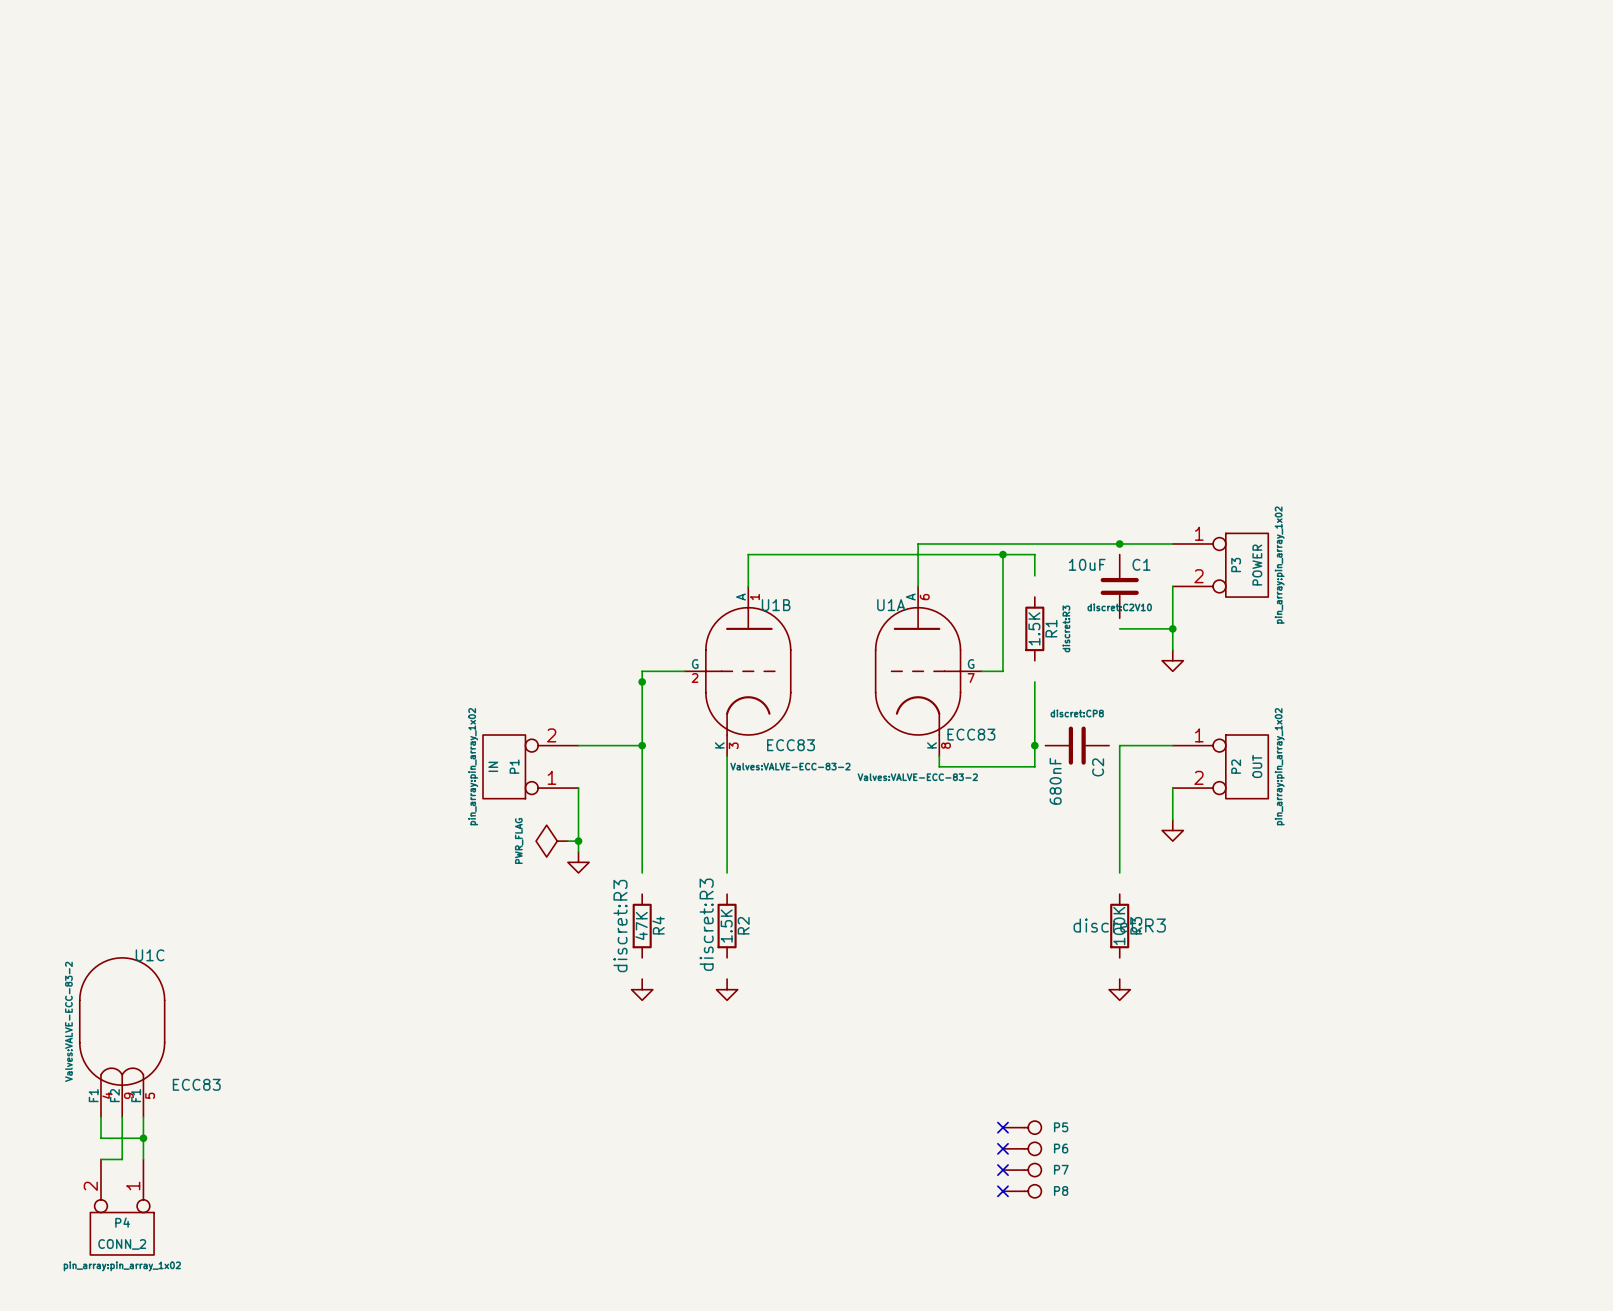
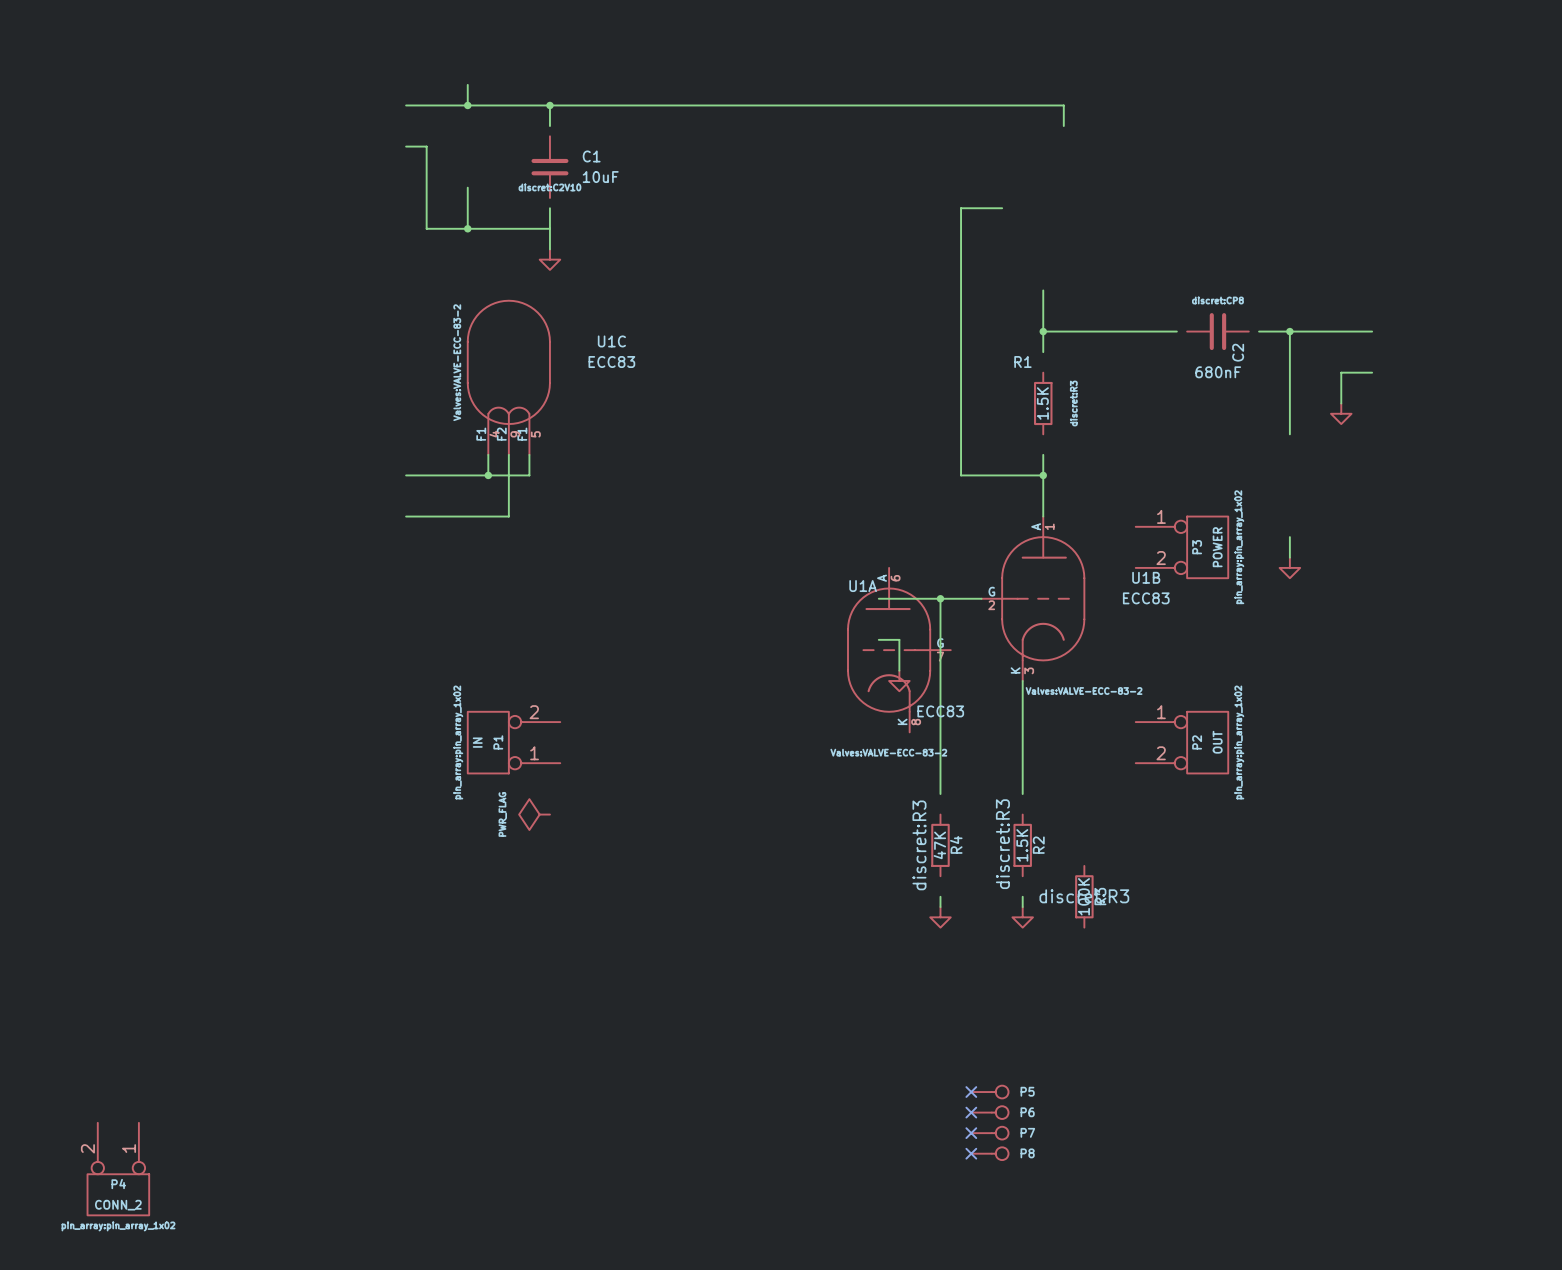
wire: none -> (467, 84) (467, 105)
wire: none -> (406, 105) (1063, 105) (1063, 126)
junction: none -> (467, 105)
wire: none -> (549, 105) (549, 126)
junction: none -> (549, 105)
wire: none -> (406, 146) (426, 146) (426, 228) (549, 228)
wire: none -> (467, 187) (467, 228)
wire: none -> (549, 208) (549, 249)
wire: none -> (1002, 208) (961, 208) (961, 475) (1043, 475)
junction: none -> (467, 228)
power symbol: none -> (549, 259)
wire: none -> (1043, 290) (1043, 352)
wire: none -> (1043, 331) (1176, 331)
junction: none -> (1043, 331)
wire: none -> (1259, 331) (1372, 331)
wire: none -> (1289, 331) (1289, 434)
junction: none -> (1289, 331)
wire: none -> (1372, 372) (1341, 372) (1341, 403)
power symbol: none -> (1341, 413)
wire: none -> (488, 454) (488, 475)
wire: none -> (508, 454) (508, 516) (406, 516)
wire: none -> (529, 454) (529, 475) (406, 475)
junction: none -> (488, 475)
junction: none -> (1043, 475)
junction: (1119, 543) -> none
wire: (1172, 543) (918, 543) (918, 586) -> none
wire: (1002, 554) (1002, 671) (981, 671) -> none
junction: (1002, 554) -> none
wire: none -> (1289, 537) (1289, 557)
C1 value position: 10uF (1087, 564) -> 10uF (600, 177)
C1 name position: C1 (1141, 564) -> C1 (591, 156)
wire: (1034, 575) (1034, 554) (748, 554) (748, 586) -> none
C1 position: (1119, 586) -> (549, 167)
wire: (1172, 586) (1172, 650) -> (1043, 454) (1043, 516)
power symbol: none -> (1289, 567)
U1B name position: U1B (776, 605) -> U1B (1146, 577)
wire: none -> (878, 598) (981, 598)
wire: none -> (940, 598) (940, 794)
junction: none -> (940, 598)
R1 position: (1034, 628) -> (1043, 403)
R1 name rotation: 0° (1051, 628) -> 90° clockwise (1022, 362)
R1 name position: R1 (1051, 628) -> R1 (1022, 362)
wire: (1119, 628) (1172, 628) -> none
junction: (1172, 628) -> none
wire: none -> (878, 639) (899, 639) (899, 670)
power symbol: (1172, 660) -> none
wire: (684, 671) (642, 671) (642, 872) -> none
U1B position: (737, 671) -> (1032, 598)
junction: (642, 681) -> none
wire: (1034, 681) (1034, 766) (939, 766) (939, 756) -> none
power symbol: none -> (899, 680)
wire: none -> (1022, 680) (1022, 794)
wire: (578, 745) (642, 745) -> none
junction: (642, 745) -> none
U1B value position: ECC83 (791, 745) -> ECC83 (1146, 598)
junction: (1034, 745) -> none
C2 position: (1077, 745) -> (1217, 331)
wire: (1172, 745) (1119, 745) (1119, 872) -> none
wire: (727, 756) (727, 872) -> none
C2 value rotation: 0° (1055, 781) -> 90° clockwise (1218, 372)
wire: (578, 788) (578, 851) -> none
wire: (1172, 788) (1172, 819) -> none
power symbol: (1172, 830) -> none
wire: (567, 841) (578, 841) -> none
junction: (578, 841) -> none
power symbol: (578, 862) -> none
R4 position: (642, 926) -> (940, 845)
R2 position: (727, 926) -> (1022, 845)
wire: none -> (940, 896) (940, 907)
wire: none -> (1022, 896) (1022, 907)
power symbol: none -> (940, 917)
U1C name position: U1C (150, 955) -> U1C (611, 341)
power symbol: (642, 989) -> none
power symbol: (727, 989) -> none
power symbol position: (1119, 989) -> (1022, 917)
U1C position: (122, 1037) -> (508, 377)
U1C value position: ECC83 (196, 1084) -> ECC83 (611, 362)
wire: (100, 1117) (100, 1138) (143, 1138) -> none
wire: (122, 1117) (122, 1159) (100, 1159) -> none
wire: (143, 1117) (143, 1159) -> none
junction: (143, 1138) -> none

